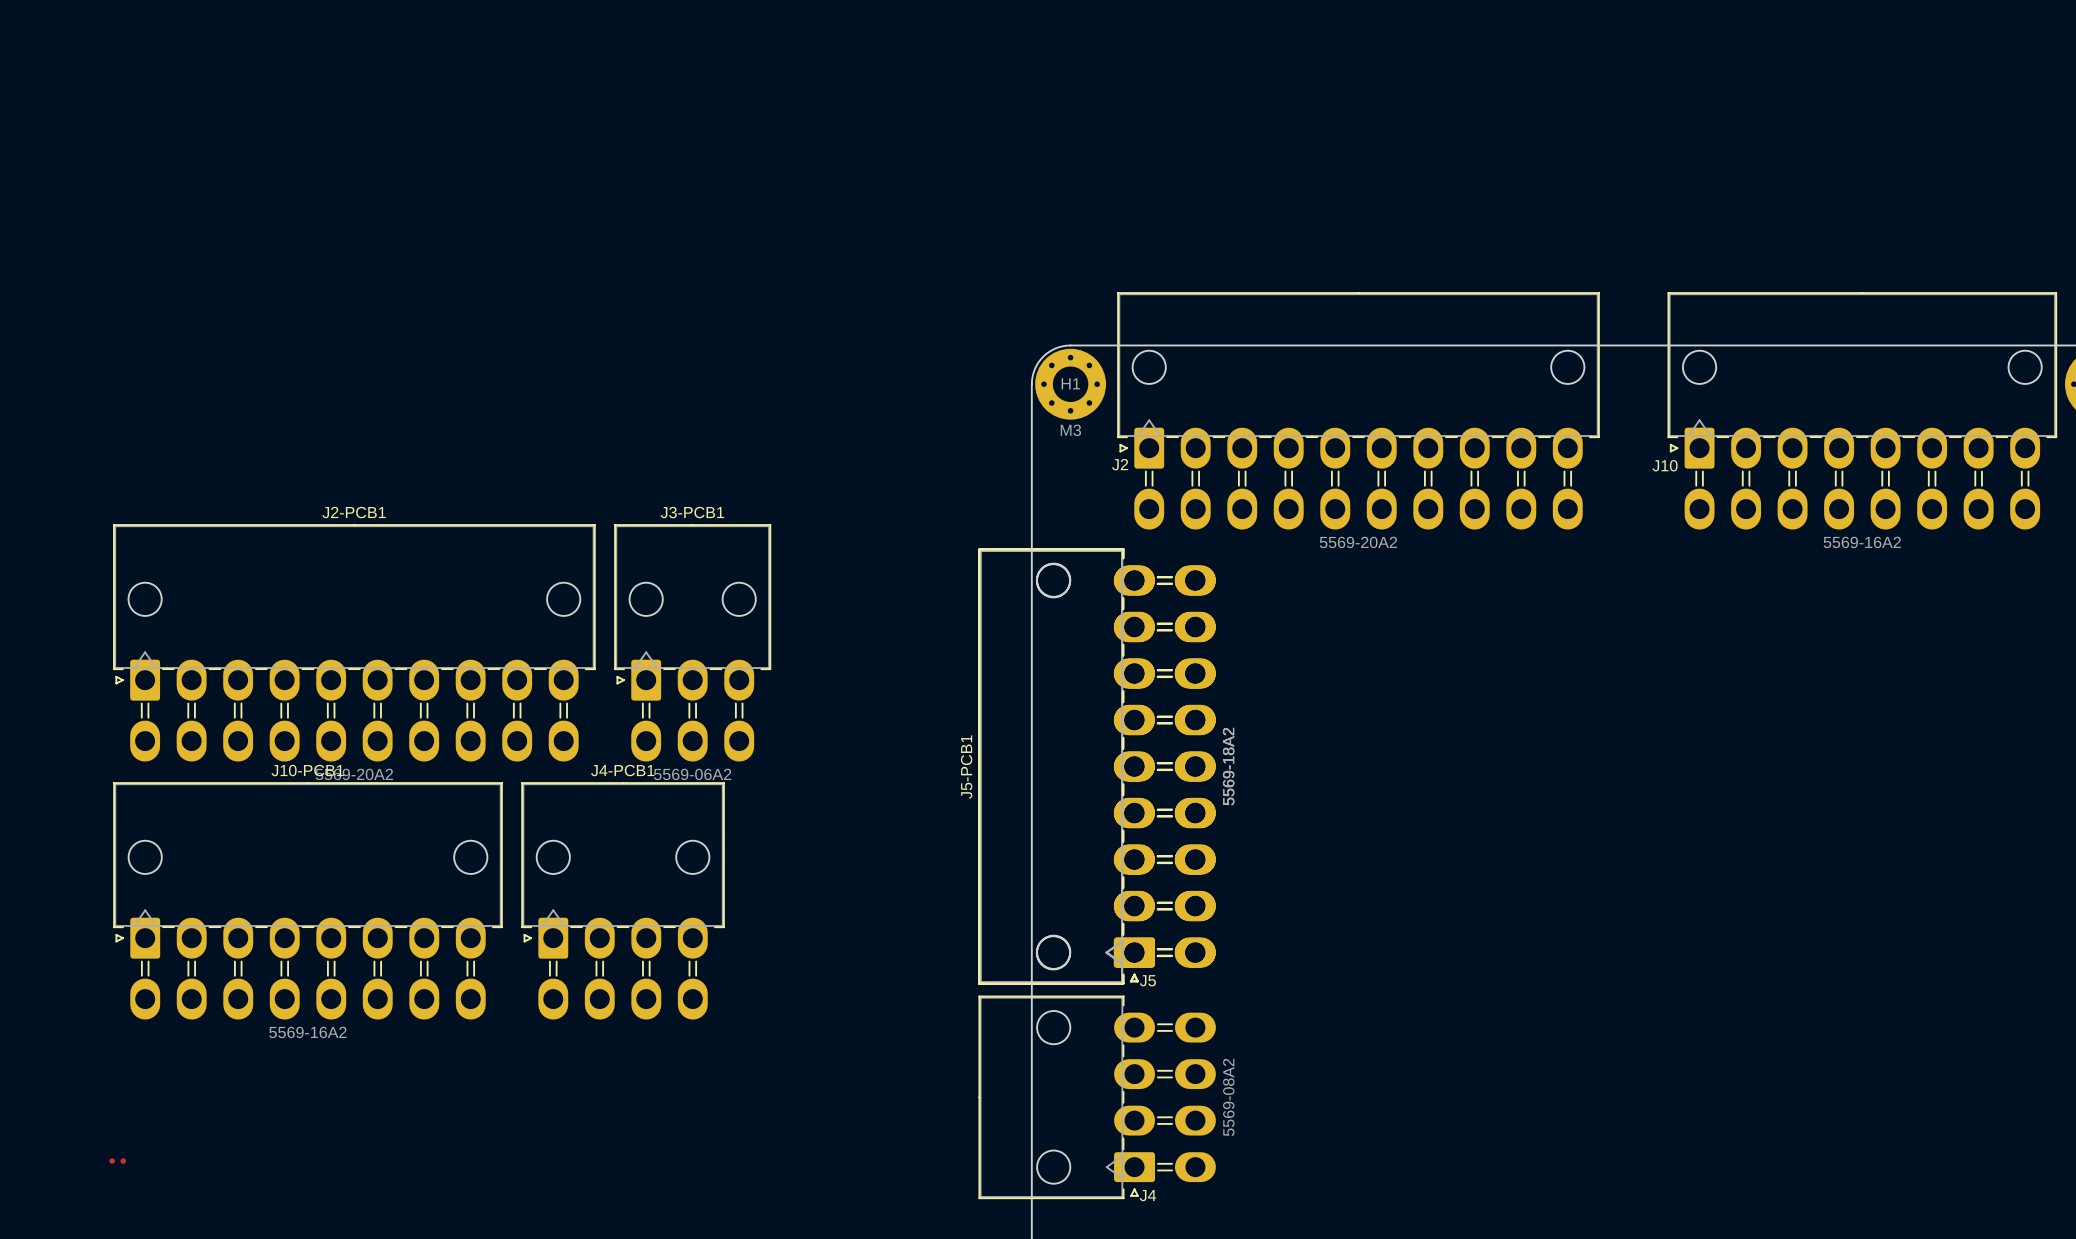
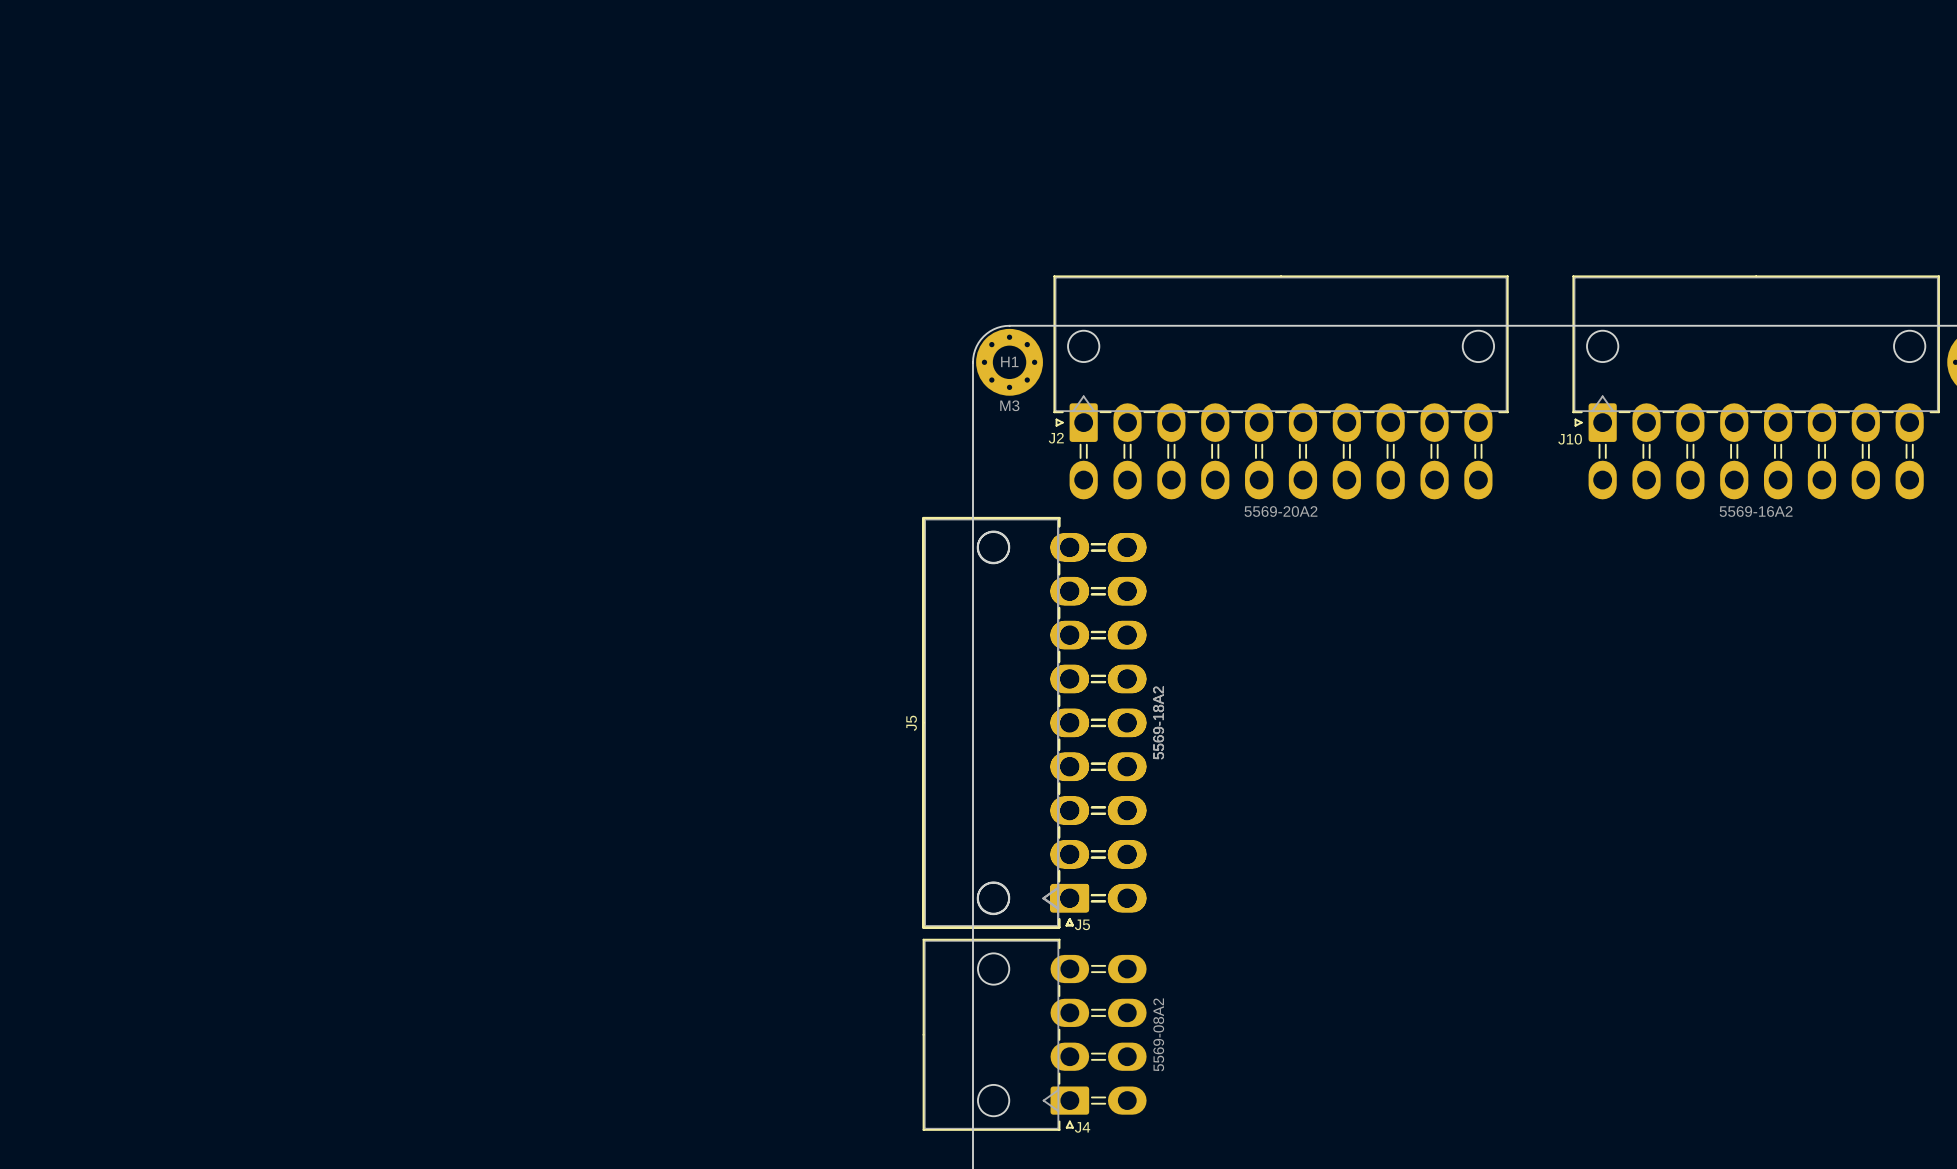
J2-PCB1: 5569-20A2 (354, 642) -> none
J3-PCB1: 5569-06A2 (692, 642) -> none
J5-PCB1 name: J5-PCB1 (966, 767) -> J5 (911, 723)
J10-PCB1: 5569-16A2 (308, 900) -> none
J4-PCB1: (623, 900) -> none
part: (117, 1161) -> none

